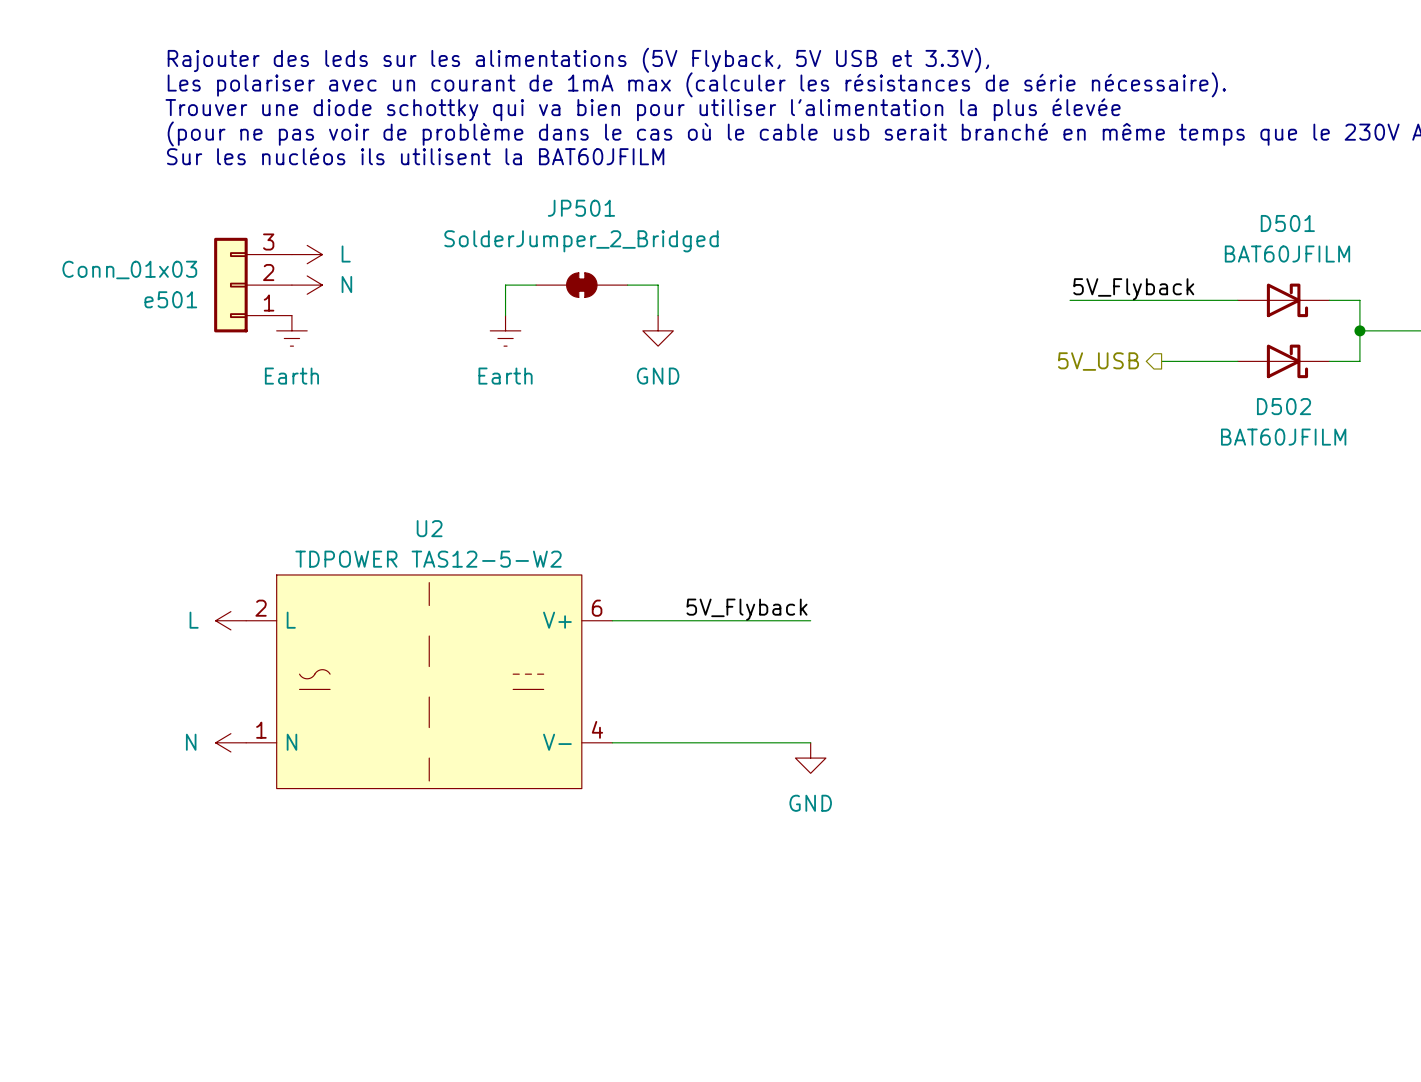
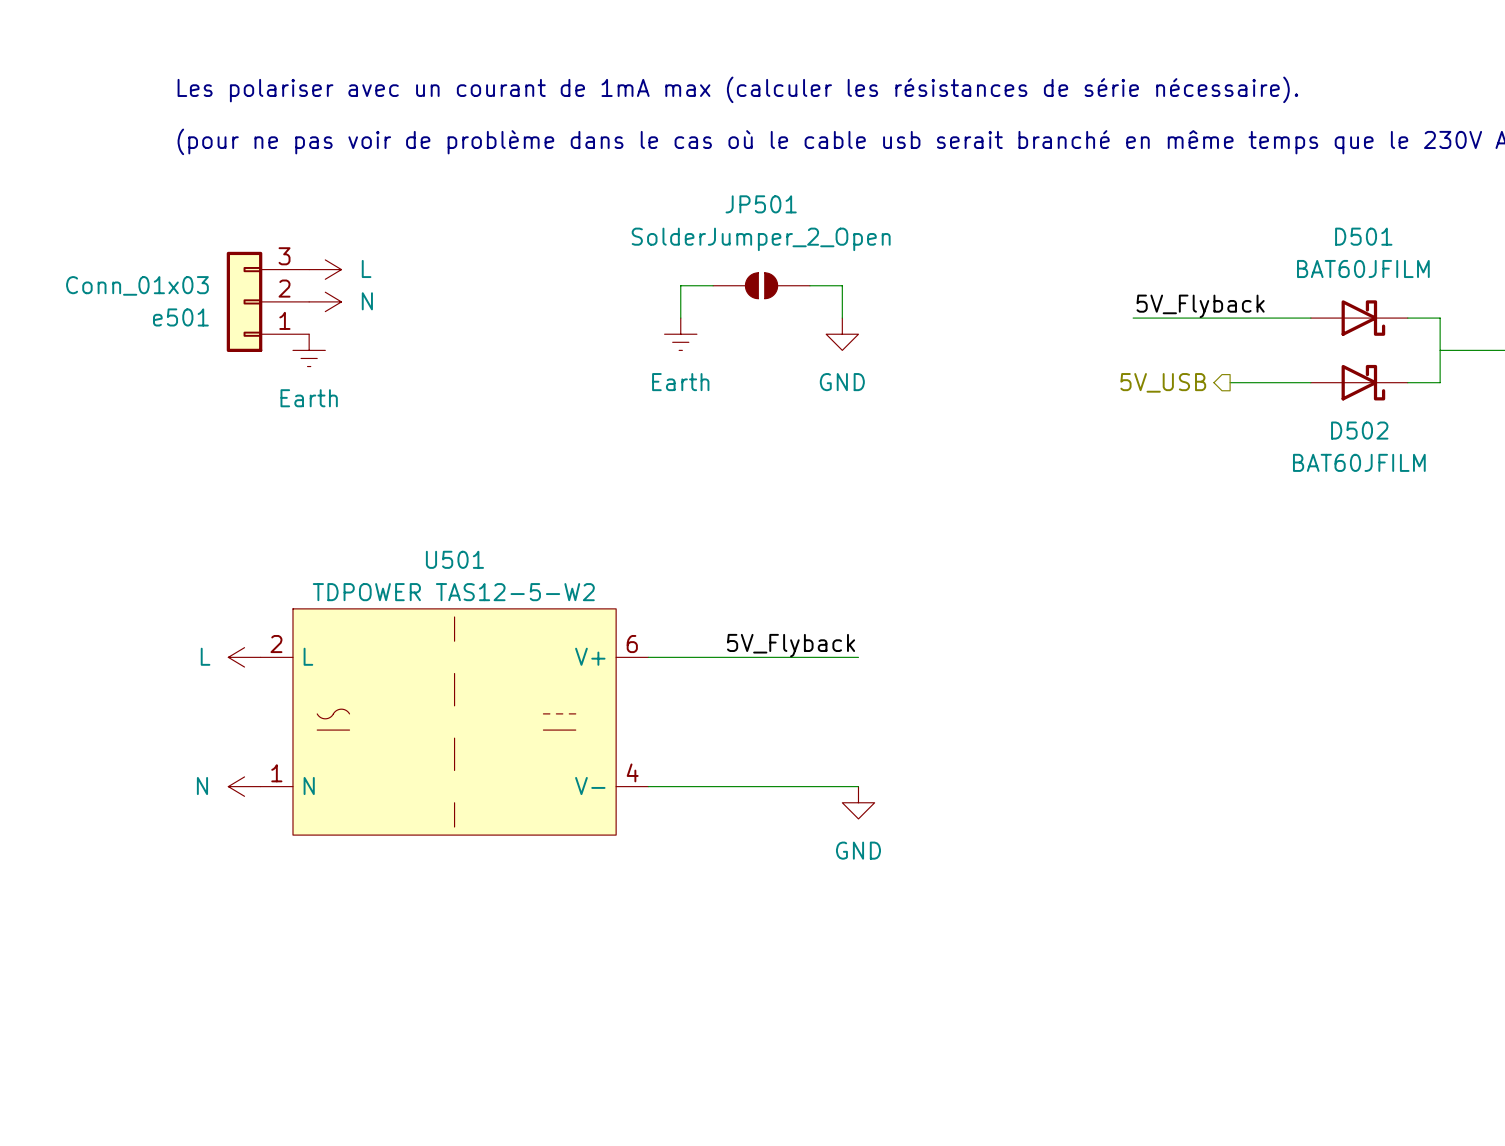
text: Rajouter des leds sur les alimentations (5V Flyback, 5V USB et 3.3V), (578, 60) -> none
text: Trouver une diode schottky qui va bien pour utiliser l'alimentation la plus élevée (643, 109) -> none
text: Sur les nucléos ils utilisent la BAT60JFILM (415, 156) -> none
JP501 value: SolderJumper_2_Bridged (581, 241) -> SolderJumper_2_Open (761, 239)
JP501 symbol: [536, 272, 628, 298] -> [713, 272, 811, 299]
wire: (536, 285) (505, 285) (505, 315) -> (713, 285) (680, 285) (680, 318)
wire: (627, 285) (658, 285) (658, 315) -> (810, 285) (842, 285) (842, 318)
power symbol position: Earth (505, 330) -> Earth (680, 334)
power symbol position: GND (658, 330) -> GND (842, 334)
junction: (1359, 330) -> none
U2 name: U2 (429, 528) -> U501 (454, 559)

